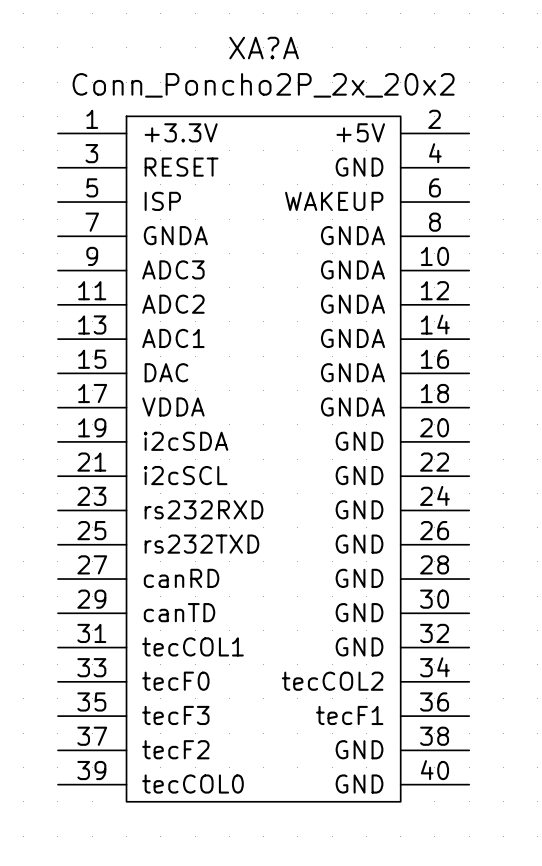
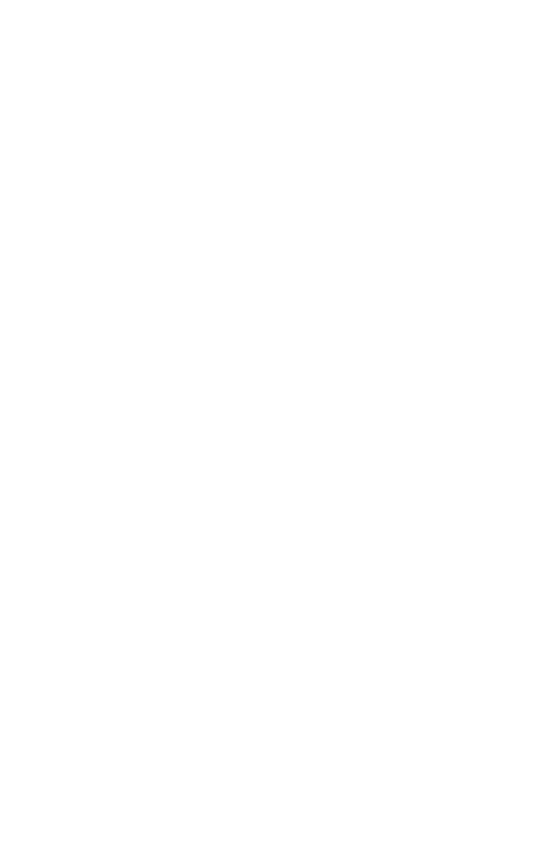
XA?A: Conn_Poncho2P_2x_20x2 (263, 459) -> none

